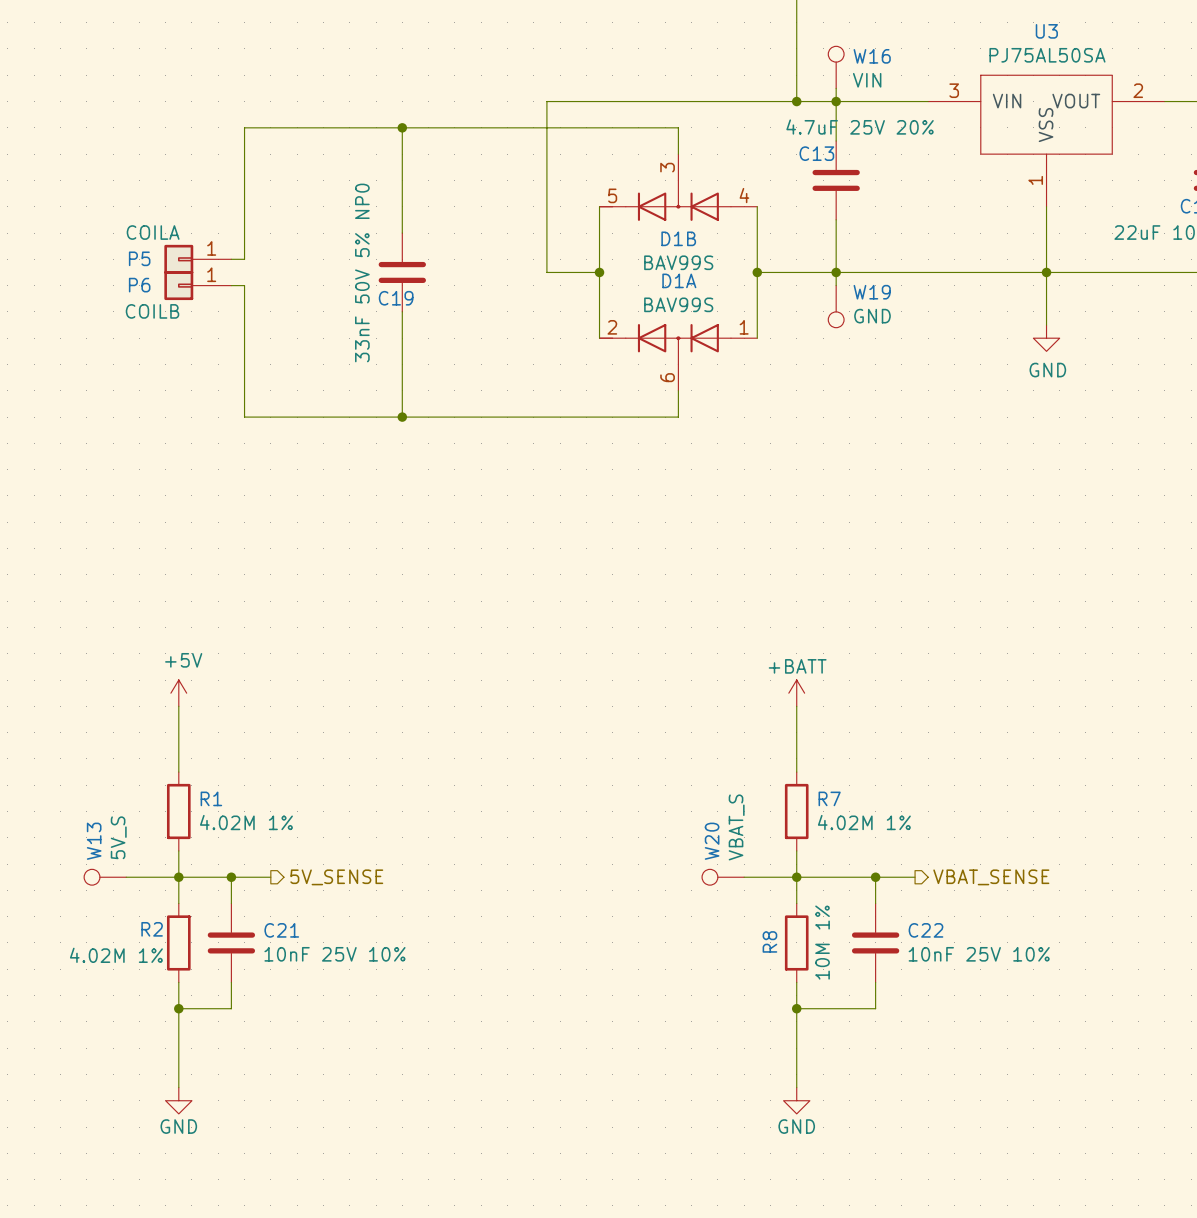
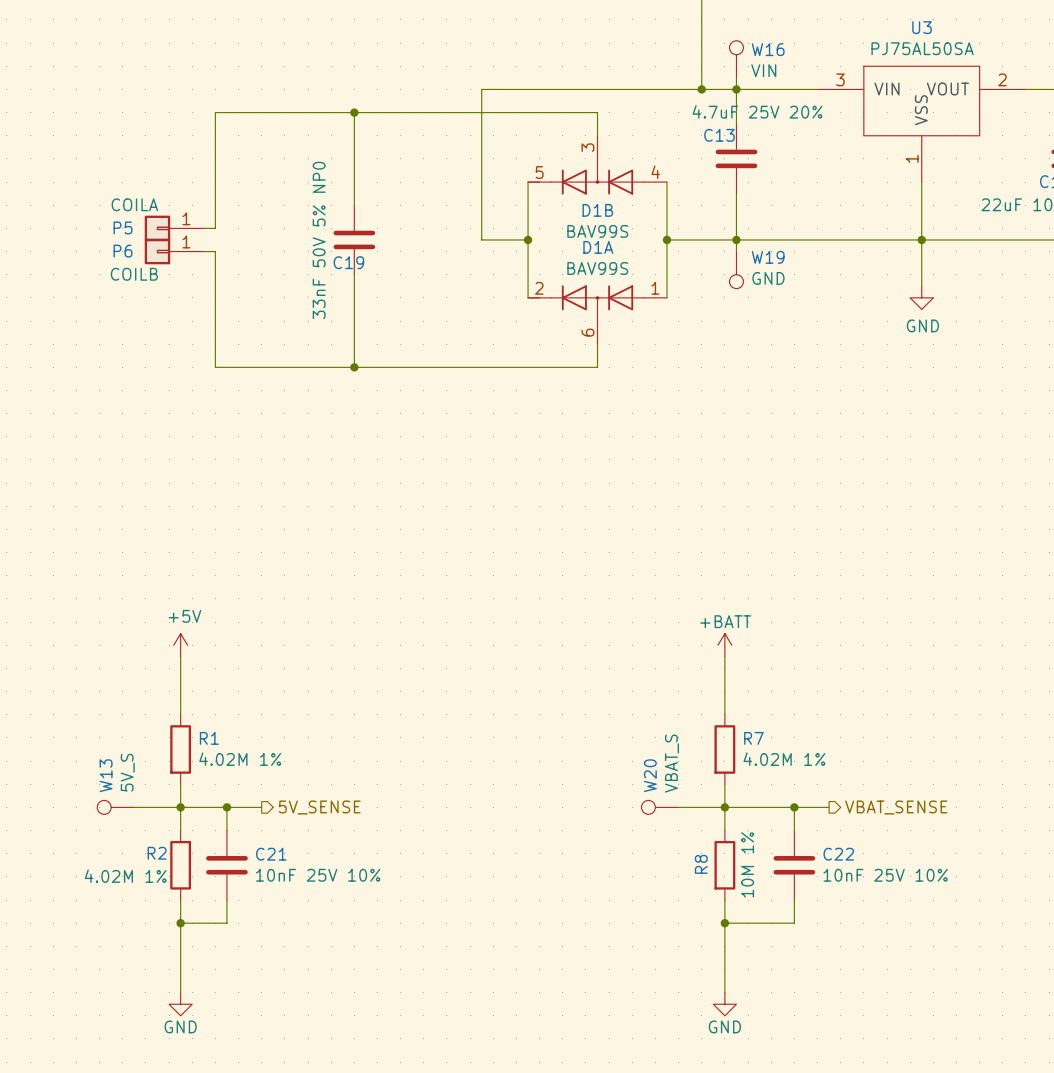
power symbol position: +5V (178, 693) -> +5V (180, 645)
power symbol position: +BATT (796, 693) -> +BATT (724, 645)
wire: (178, 706) (178, 772) -> (180, 656) (180, 714)
wire: (796, 706) (796, 772) -> (724, 656) (724, 714)
R1 position: (178, 811) -> (180, 749)
R7 position: (796, 811) -> (724, 749)
wire: (178, 850) (178, 903) -> (180, 784) (180, 830)
wire: (796, 850) (796, 903) -> (724, 784) (724, 830)
W13 position: (105, 877) -> (115, 807)
wire: (126, 877) (270, 877) -> (134, 807) (261, 807)
junction: (178, 877) -> none
wire: (231, 877) (231, 903) -> (226, 807) (226, 830)
junction: (231, 877) -> none
hierarchical label position: 5V_SENSE (336, 877) -> 5V_SENSE (319, 807)
W20 position: (723, 877) -> (660, 807)
wire: (744, 877) (915, 877) -> (678, 807) (829, 807)
junction: (796, 877) -> none
wire: (875, 877) (875, 903) -> (794, 807) (794, 830)
junction: (875, 877) -> none
hierarchical label position: VBAT_SENSE (991, 877) -> VBAT_SENSE (896, 807)
junction: none -> (180, 807)
junction: none -> (226, 807)
junction: none -> (724, 807)
junction: none -> (794, 807)
R2 position: (178, 942) -> (180, 865)
C21 position: (231, 942) -> (226, 865)
R8 position: (796, 942) -> (724, 865)
C22 position: (875, 942) -> (794, 865)
wire: (178, 982) (178, 1087) -> (180, 900) (180, 992)
wire: (231, 982) (231, 1008) (178, 1008) -> (226, 900) (226, 923) (180, 923)
wire: (796, 982) (796, 1087) -> (724, 900) (724, 992)
wire: (875, 982) (875, 1008) (796, 1008) -> (794, 900) (794, 923) (724, 923)
junction position: (178, 1008) -> (180, 923)
junction position: (796, 1008) -> (724, 923)
power symbol position: GND (178, 1100) -> GND (180, 1004)
power symbol position: GND (796, 1100) -> GND (724, 1004)

